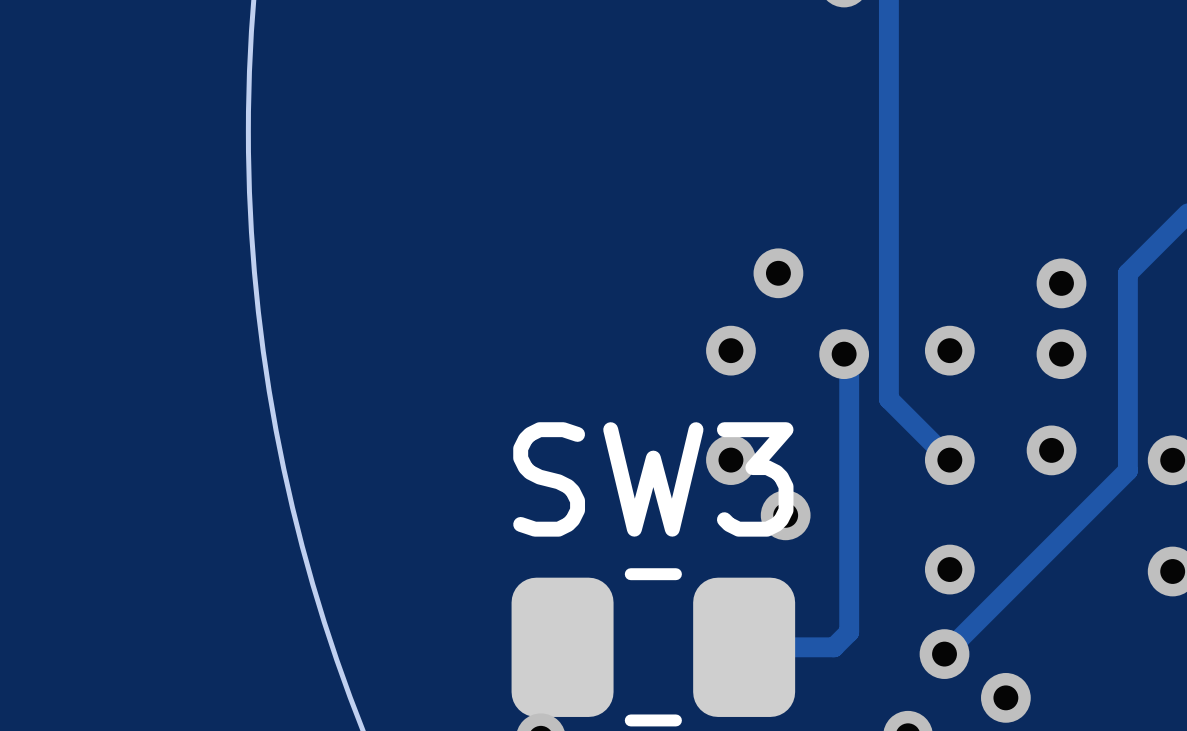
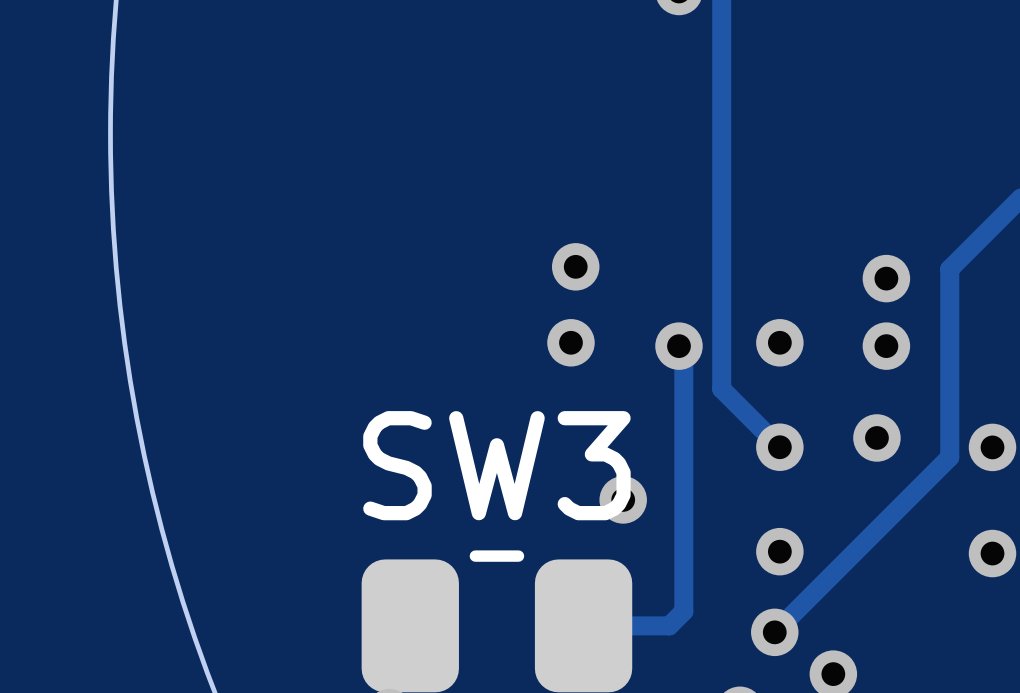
via position: (778, 273) -> (575, 266)
via: (730, 460) -> none

